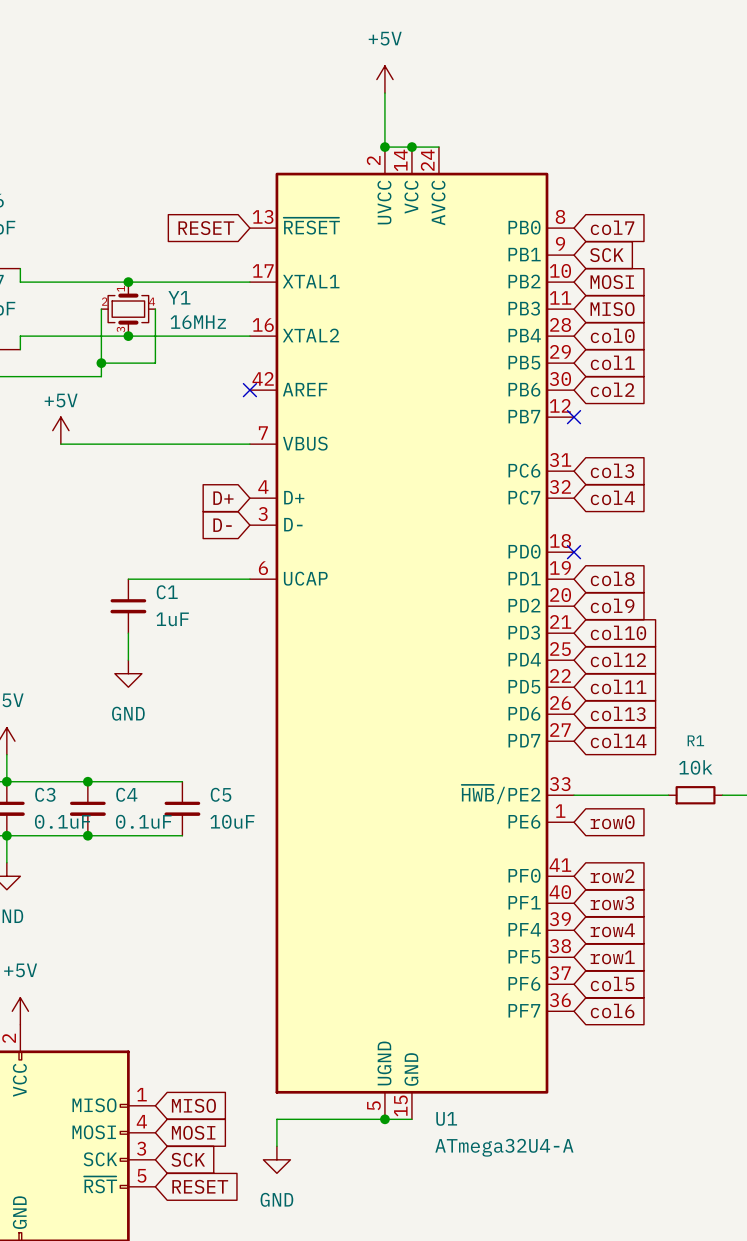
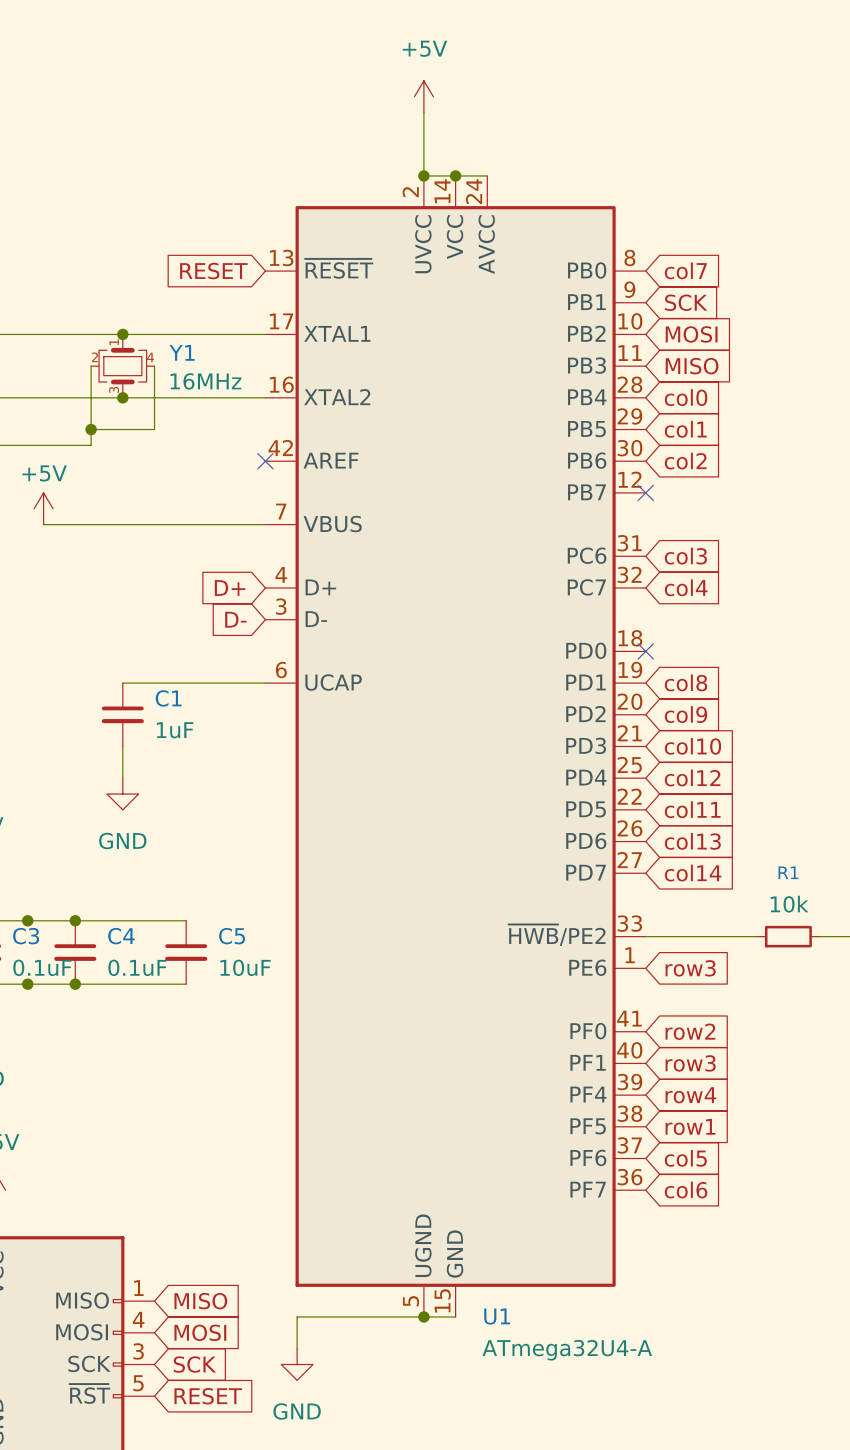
junction: none -> (27, 920)
global label: row0 (612, 822) -> row3 (690, 968)
junction: none -> (27, 984)

